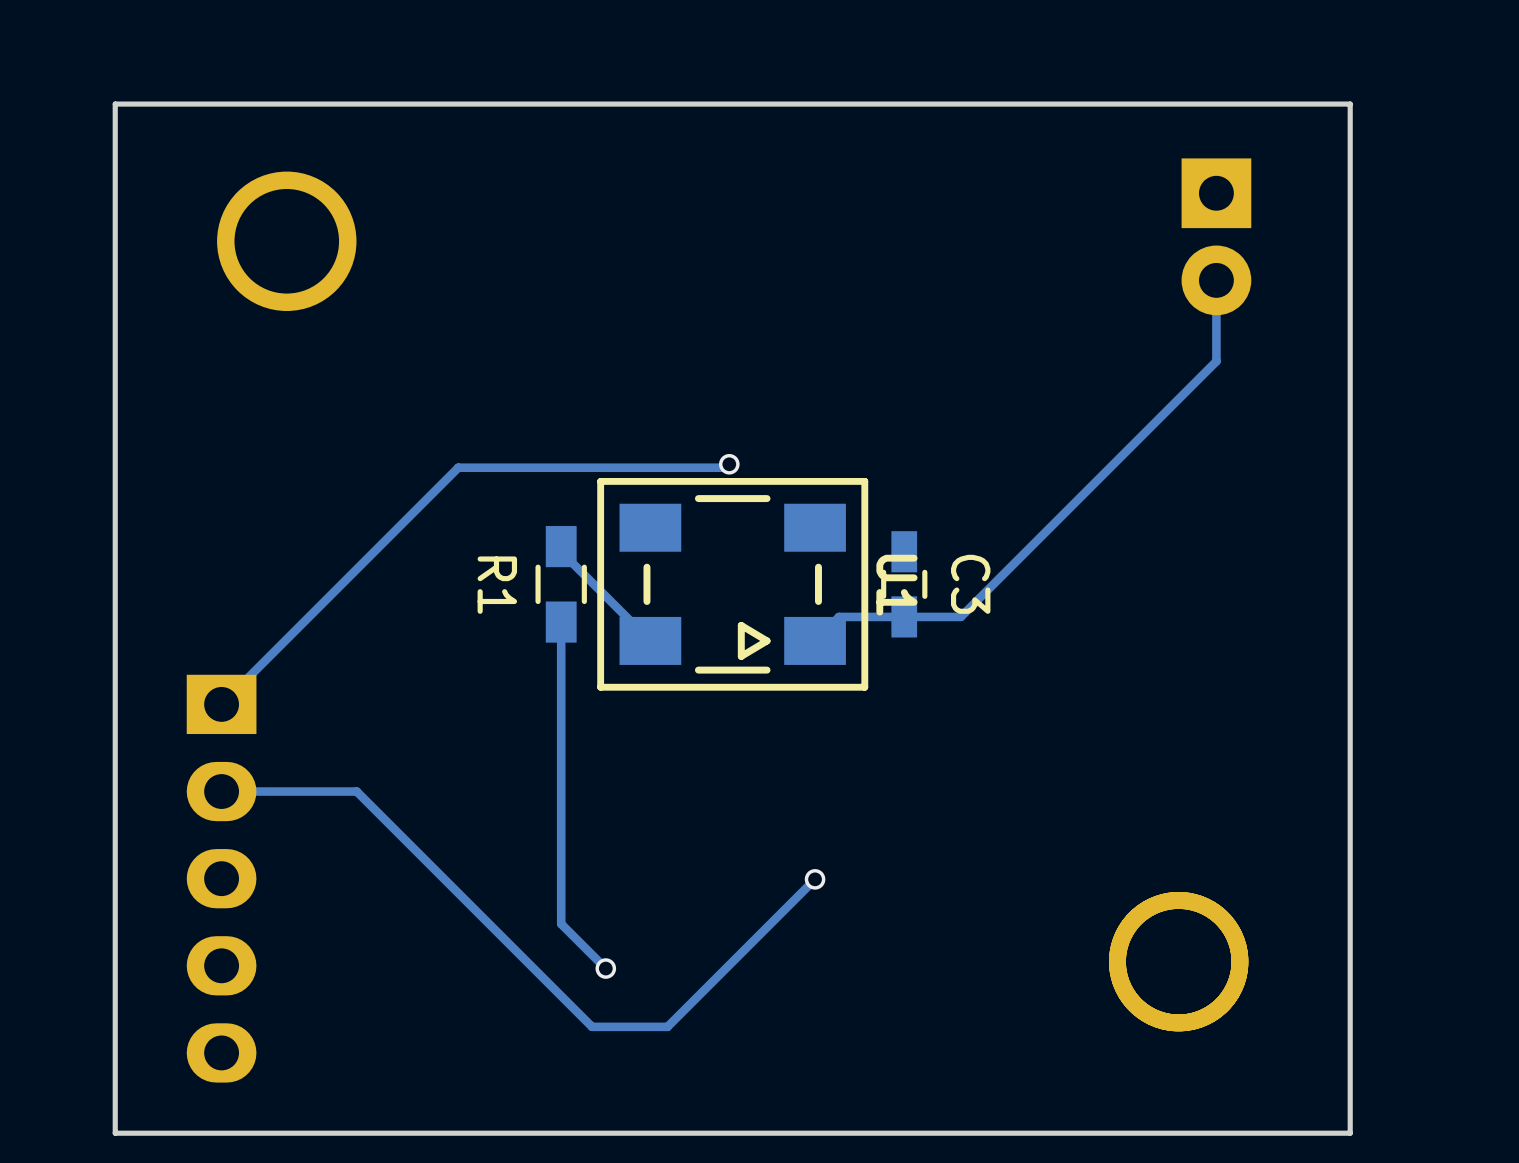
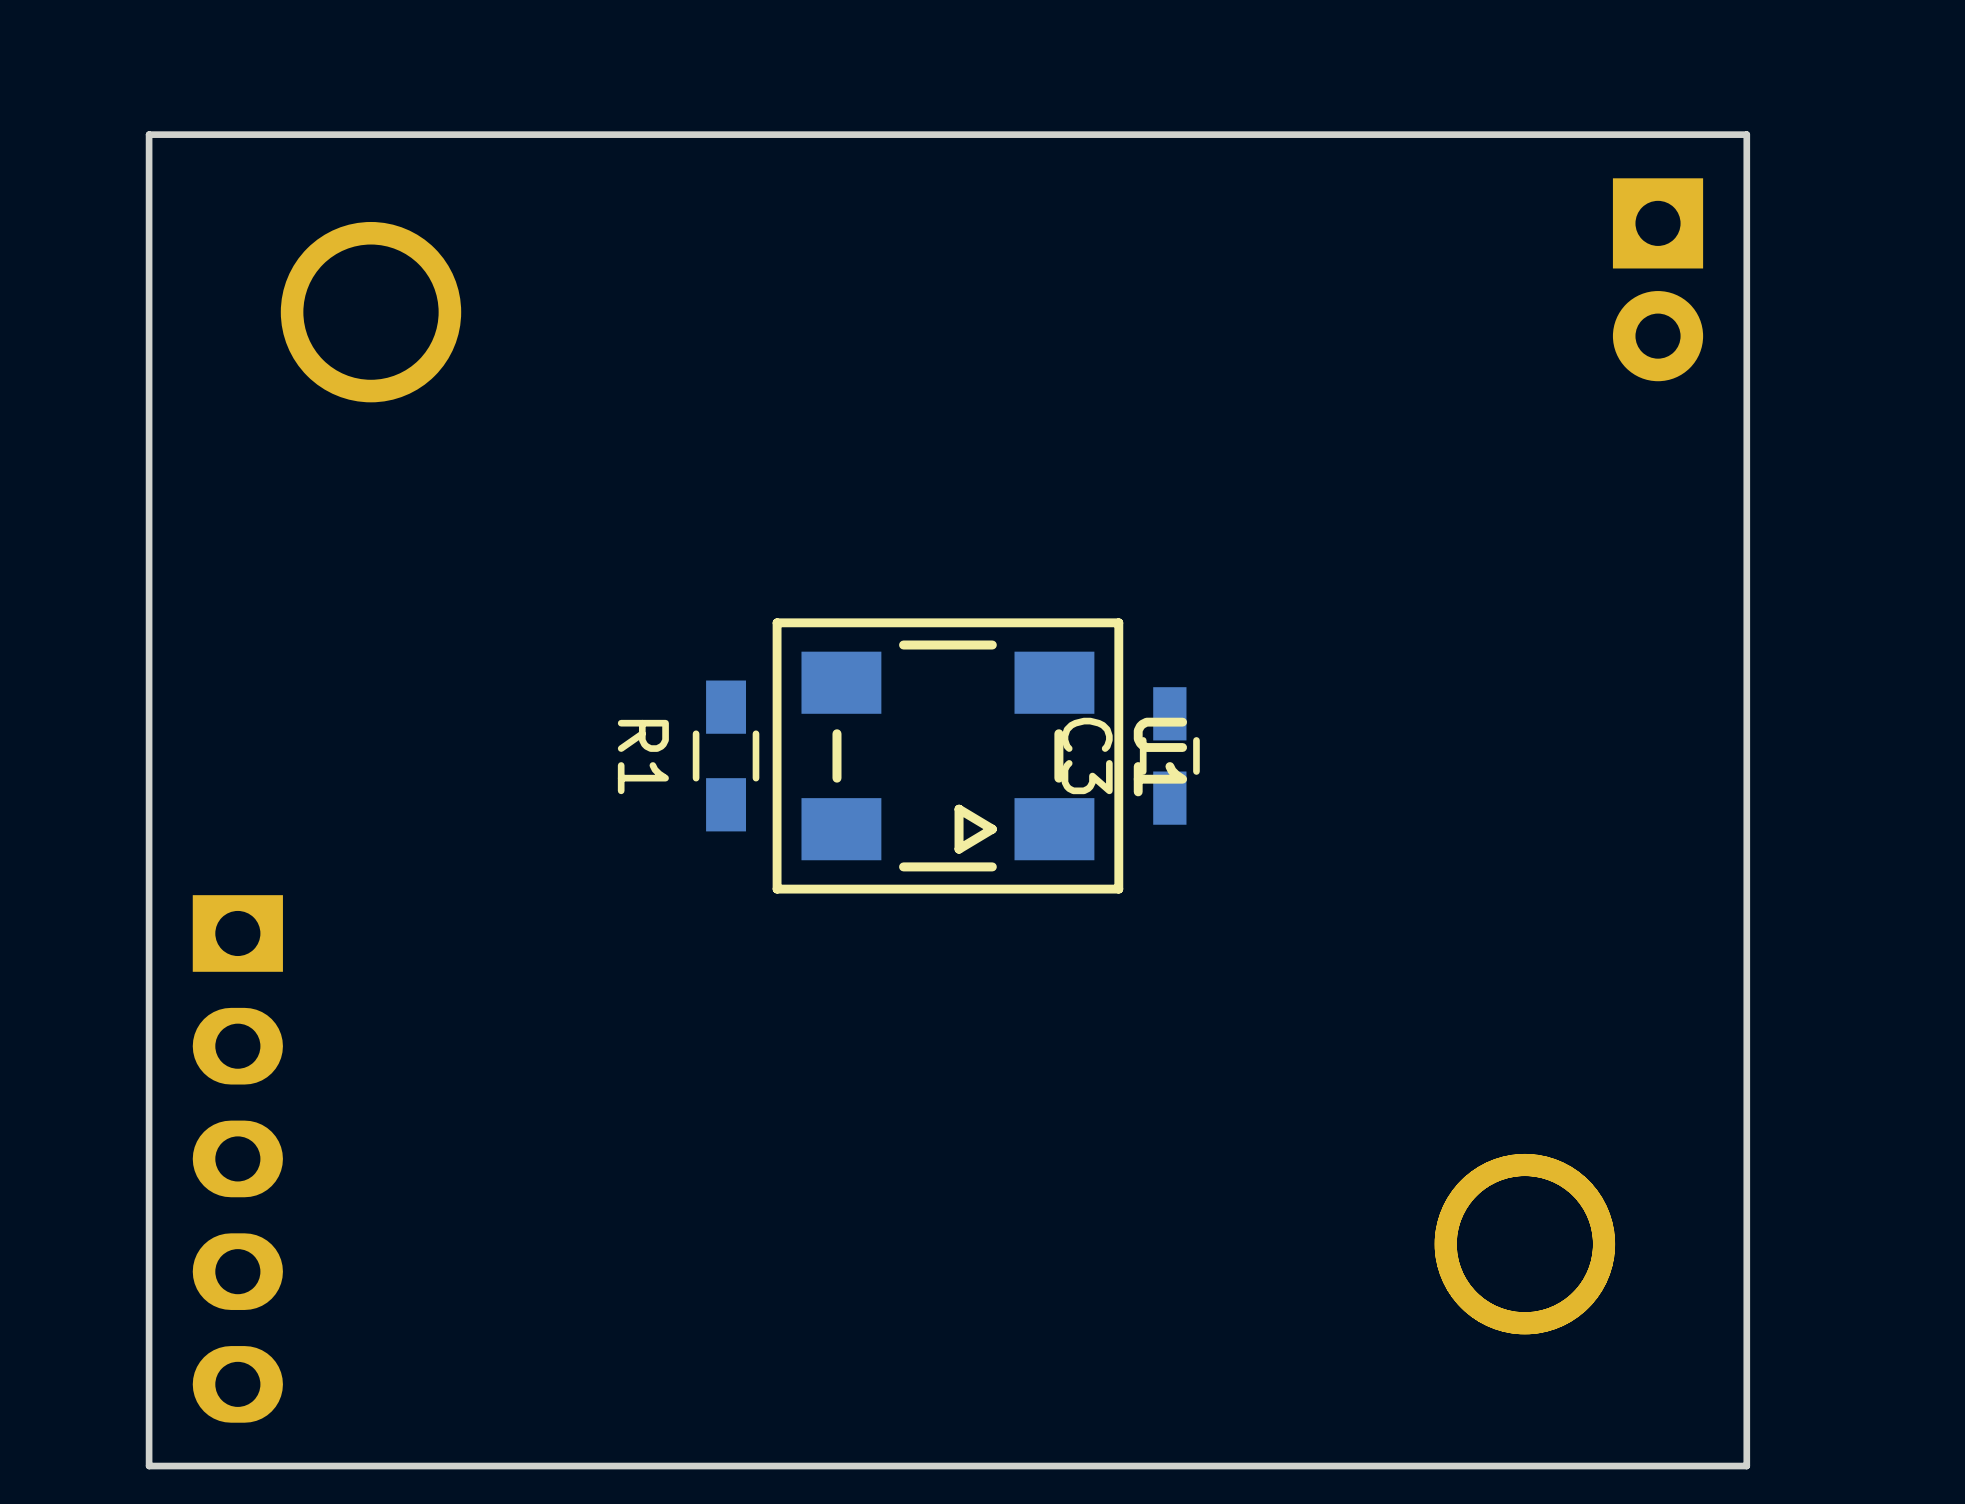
part position: (1216, 236) -> (1658, 279)
track: (1216, 280) (1216, 361) (960, 616) (839, 616) (815, 640) -> none
track: (729, 464) (725, 467) (458, 467) (221, 704) -> none
via: (729, 464) -> none
track: (561, 546) (561, 551) (650, 640) -> none
C3 name position: C3 (970, 584) -> C3 (1087, 755)
track: (561, 622) (561, 923) (605, 968) -> none
track: (221, 791) (356, 791) (592, 1026) (667, 1026) (815, 879) -> none
part position: (221, 878) -> (237, 1158)
via: (815, 879) -> none
via: (605, 968) -> none

